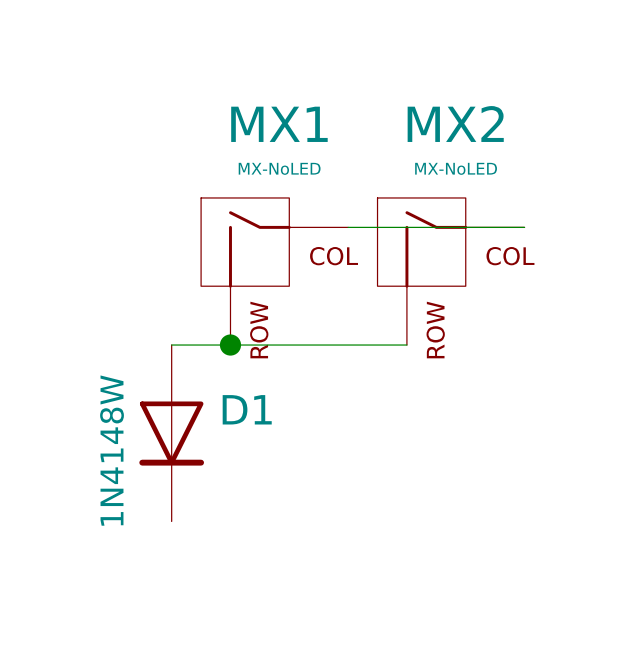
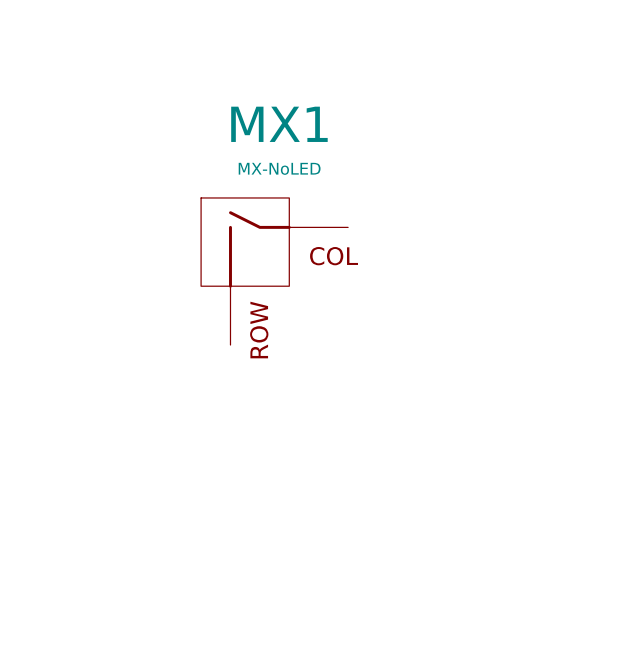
wire: (348, 227) (524, 227) -> none
MX2: MX-NoLED (451, 271) -> none
wire: (171, 345) (406, 345) -> none
junction: (230, 345) -> none
D1: 1N4148W (171, 433) -> none

